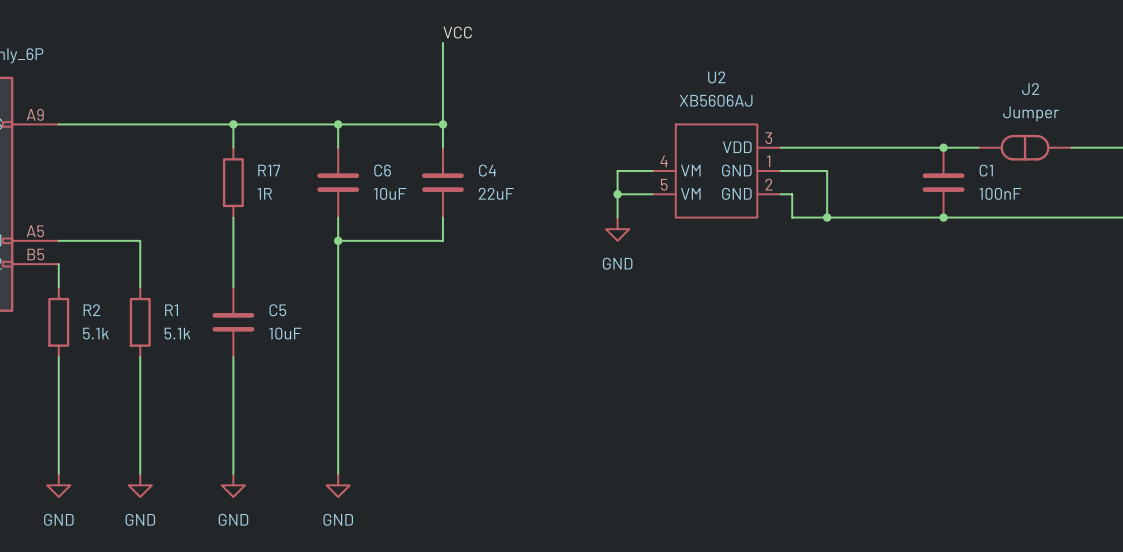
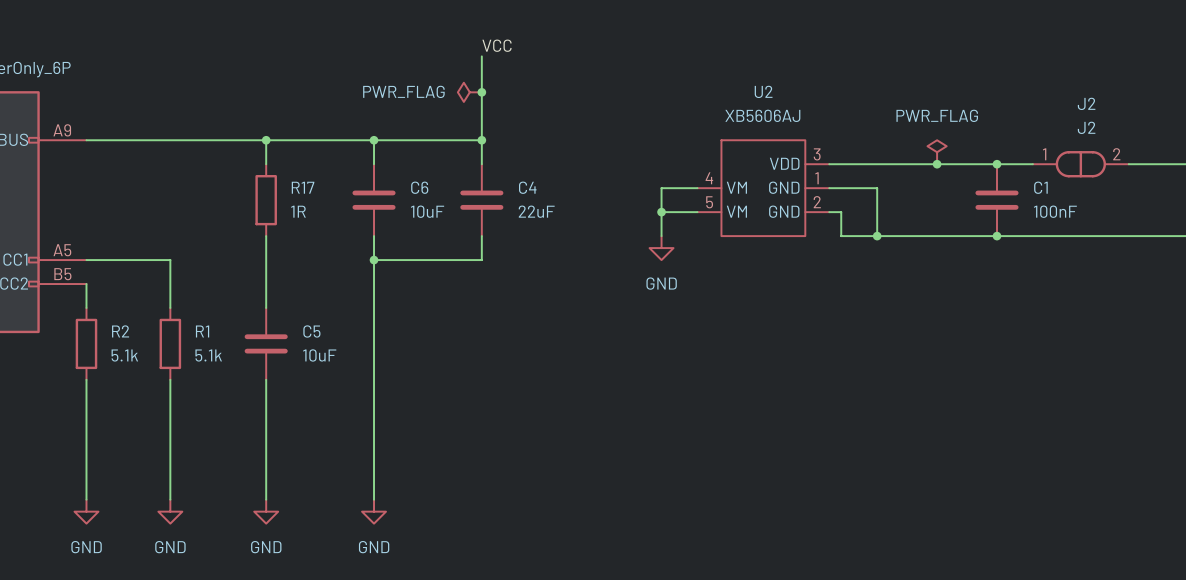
power symbol: none -> PWR_FLAG (469, 92)
junction: none -> (481, 92)
J2 value: Jumper (1030, 113) -> J2 (1086, 127)
power symbol: none -> PWR_FLAG (937, 152)
J2 pin number: none -> 1 (1044, 154)
J2 pin number: none -> 2 (1116, 154)
junction: none -> (937, 164)

